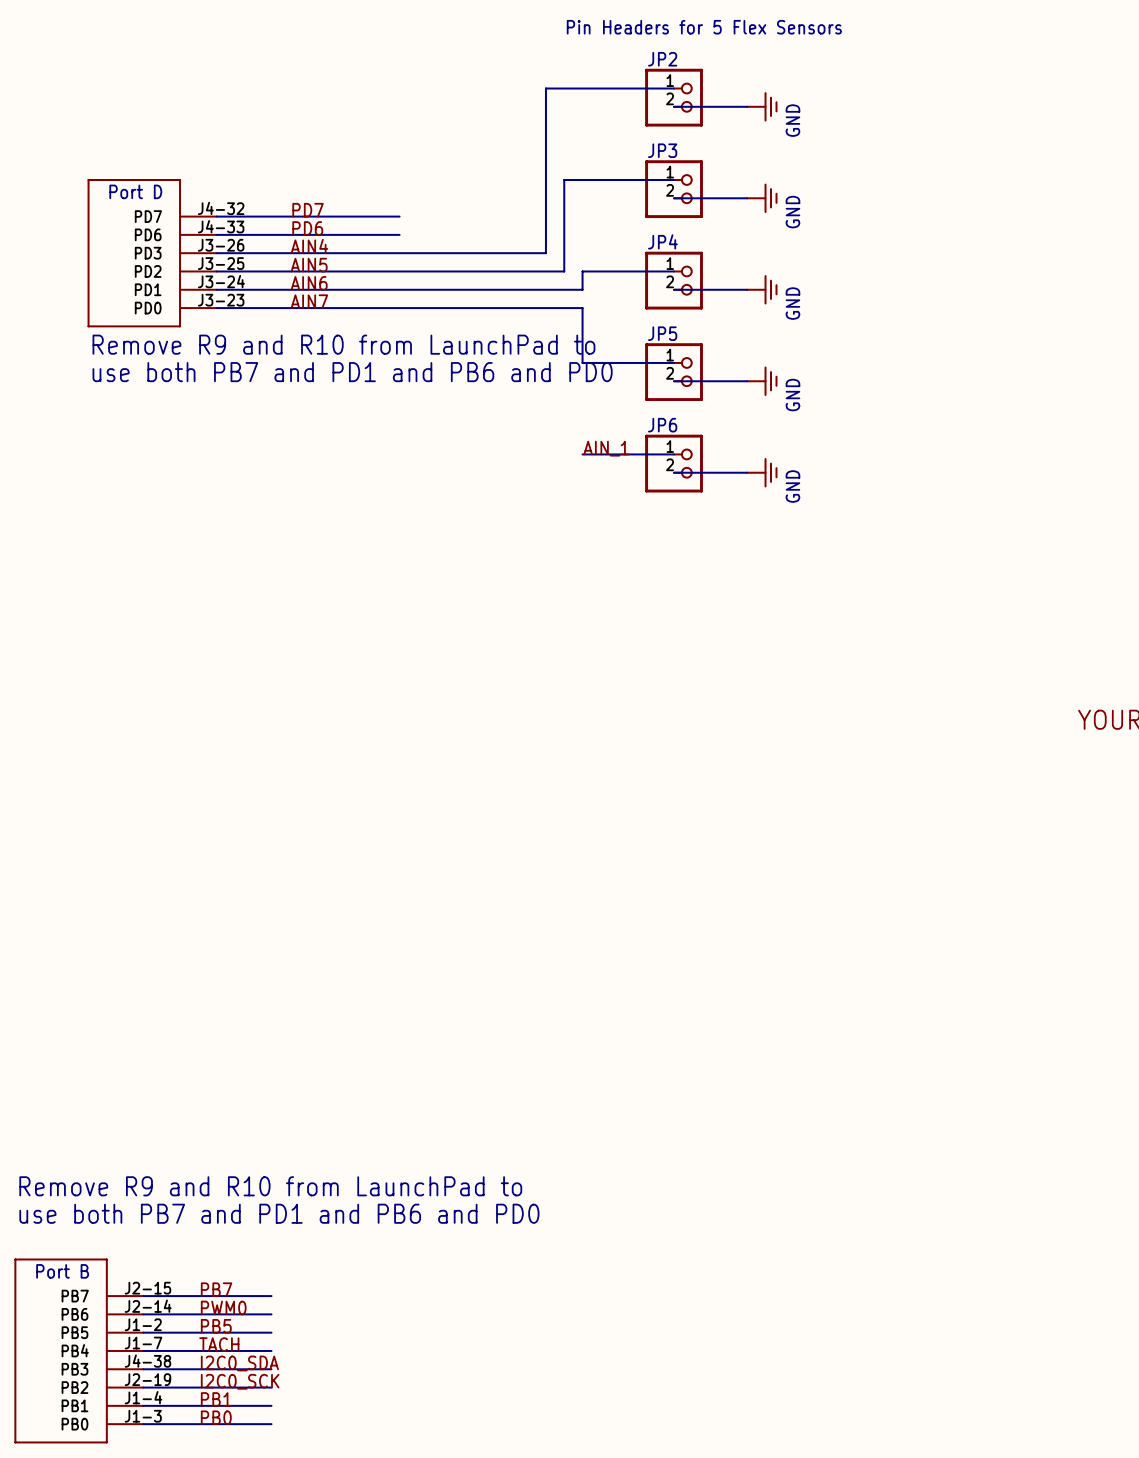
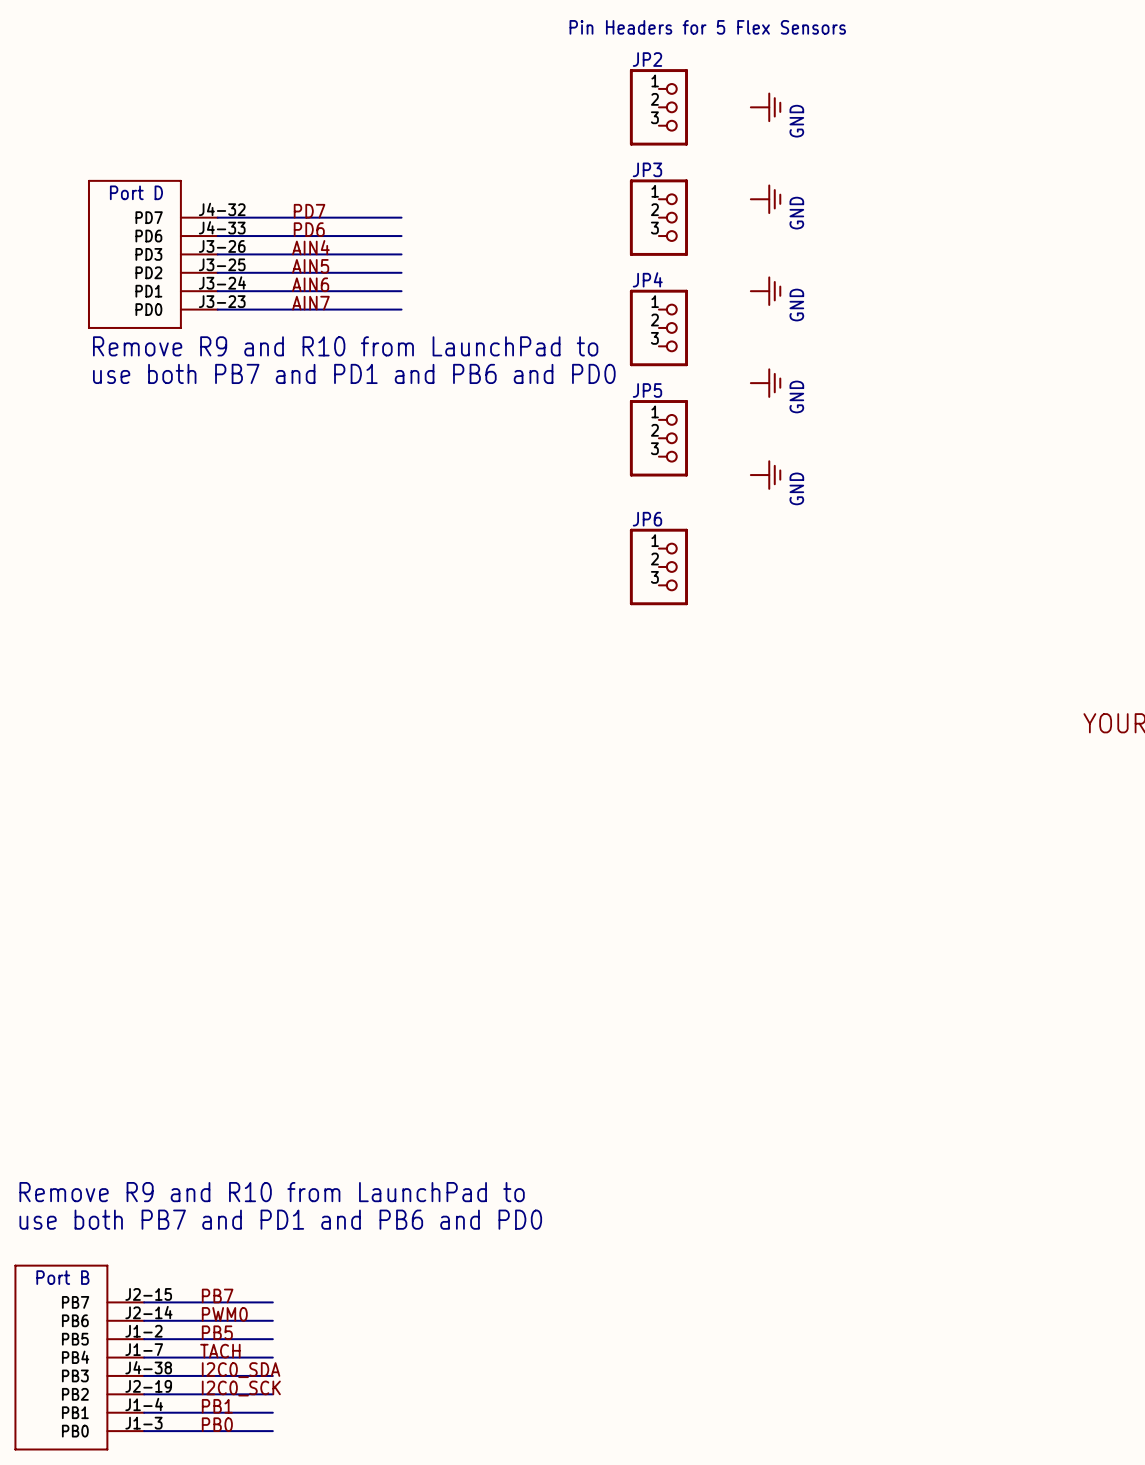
JP2 symbol: [645, 68, 703, 127] -> [629, 69, 688, 146]
wire: (674, 88) (545, 88) (545, 253) (399, 253) -> none
wire: (674, 106) (747, 106) -> none
JP3 symbol: [645, 160, 703, 219] -> [629, 179, 688, 256]
wire: (674, 180) (564, 180) (564, 271) (399, 271) -> none
wire: (674, 198) (747, 198) -> none
JP4 symbol: [645, 251, 703, 310] -> [629, 289, 688, 367]
wire: (674, 271) (582, 271) (582, 289) (399, 289) -> none
wire: (674, 289) (747, 289) -> none
wire: (399, 308) (582, 308) (582, 362) (674, 362) -> none
JP5 symbol: [645, 343, 703, 402] -> [629, 400, 688, 477]
wire: (674, 381) (747, 381) -> none
JP6 symbol: [645, 434, 703, 493] -> [629, 528, 688, 606]
label: AIN_1 (606, 448) -> none
wire: (582, 454) (674, 454) -> none
wire: (674, 472) (747, 472) -> none

